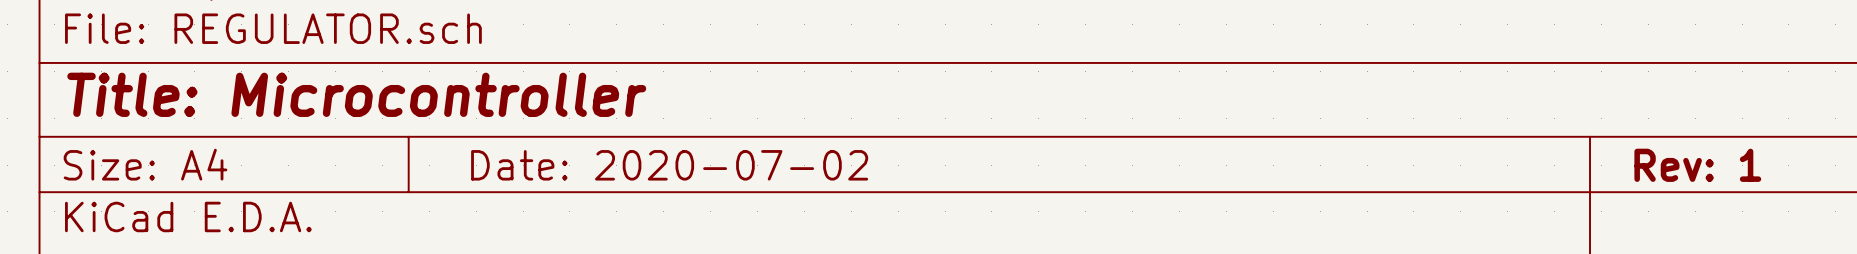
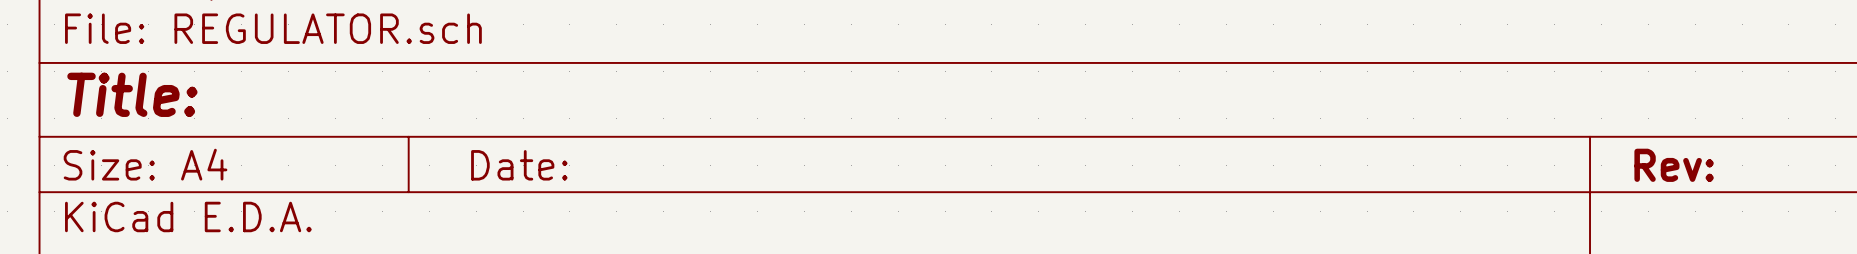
title block: Title: Microcontroller (356, 94) -> Title: (132, 94)
title block: Date: 2020-07-02 (669, 165) -> Date: (519, 165)
title block: Rev: 1 (1697, 165) -> Rev: (1674, 165)

